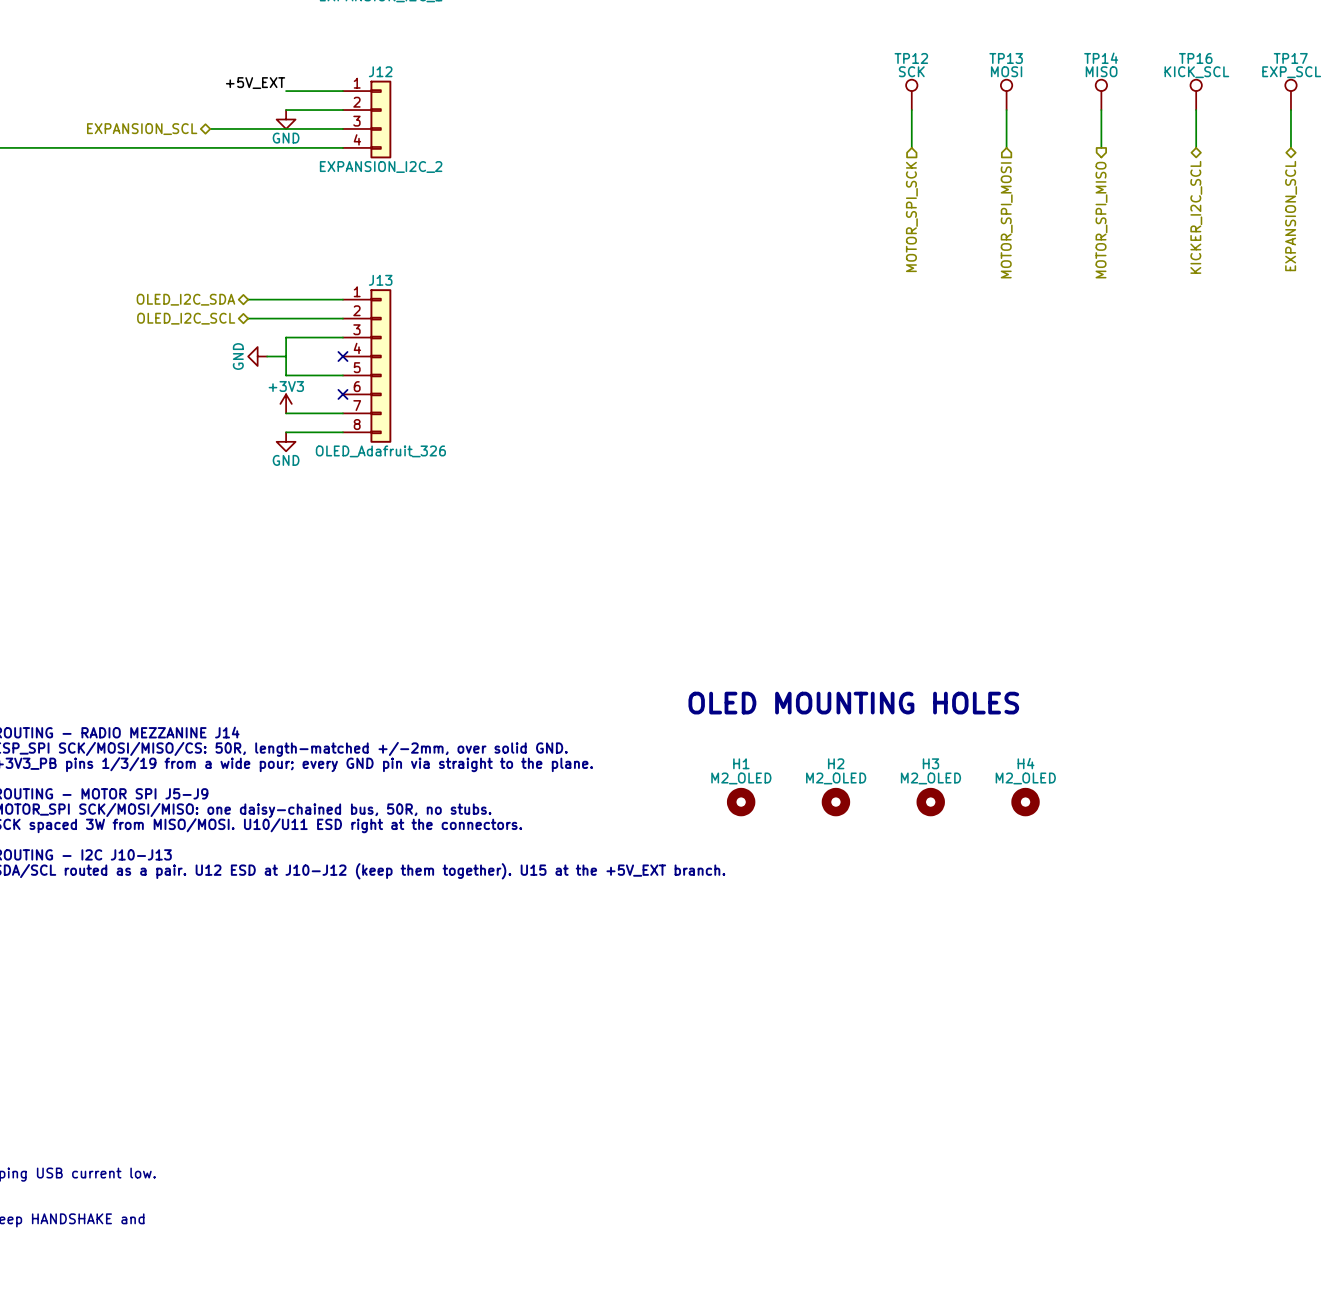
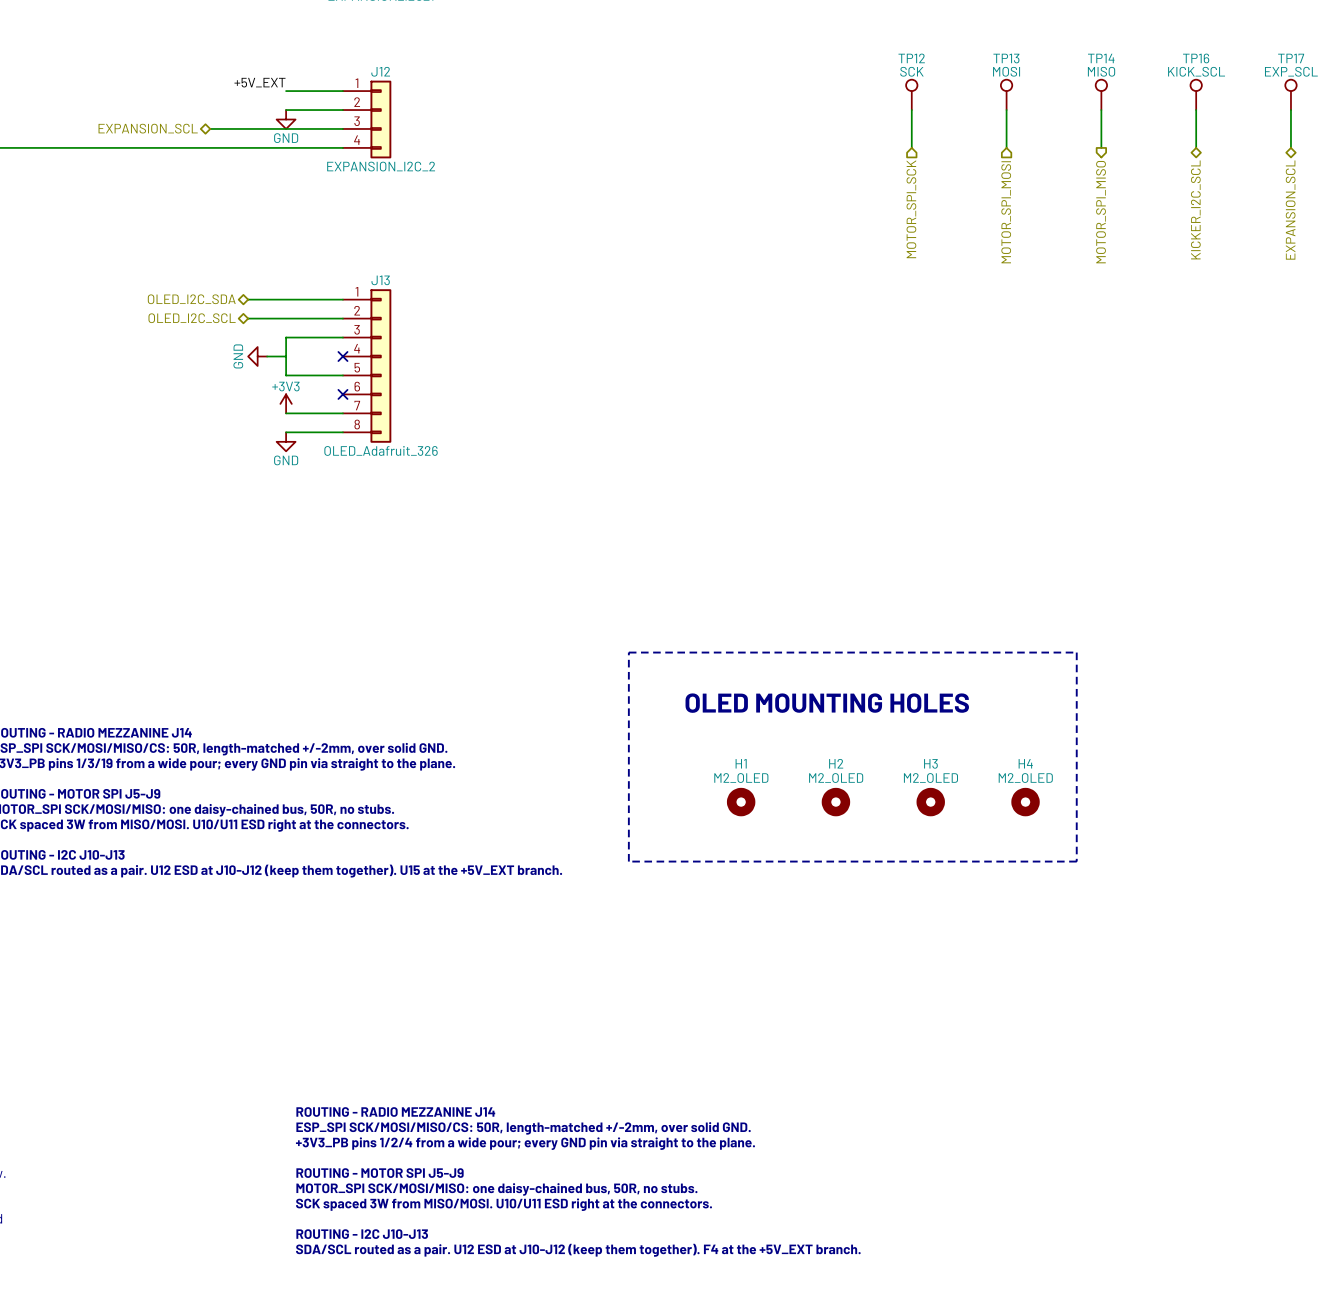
line: none -> (628, 652) (1076, 652) (1076, 861) (628, 861) (628, 652)
text: none -> ROUTING - RADIO MEZZANINE J14 (395, 1112)
text: none -> ESP_SPI SCK/MOSI/MISO/CS: 50R, length-matched +/-2mm, over solid GND. (523, 1128)
text: none -> +3V3_PB pins 1/2/4 from a wide pour; every GND pin via straight to the plane. (525, 1143)
text: none -> ROUTING - MOTOR SPI J5-J9 (380, 1173)
text: none -> MOTOR_SPI SCK/MOSI/MISO: one daisy-chained bus, 50R, no stubs. (496, 1189)
text: none -> SCK spaced 3W from MISO/MOSI. U10/U11 ESD right at the connectors. (504, 1204)
text: none -> ROUTING - I2C J10-J13 (362, 1234)
text: none -> SDA/SCL routed as a pair. U12 ESD at J10-J12 (keep them together). F4 at the +5V_EXT branch. (578, 1250)

